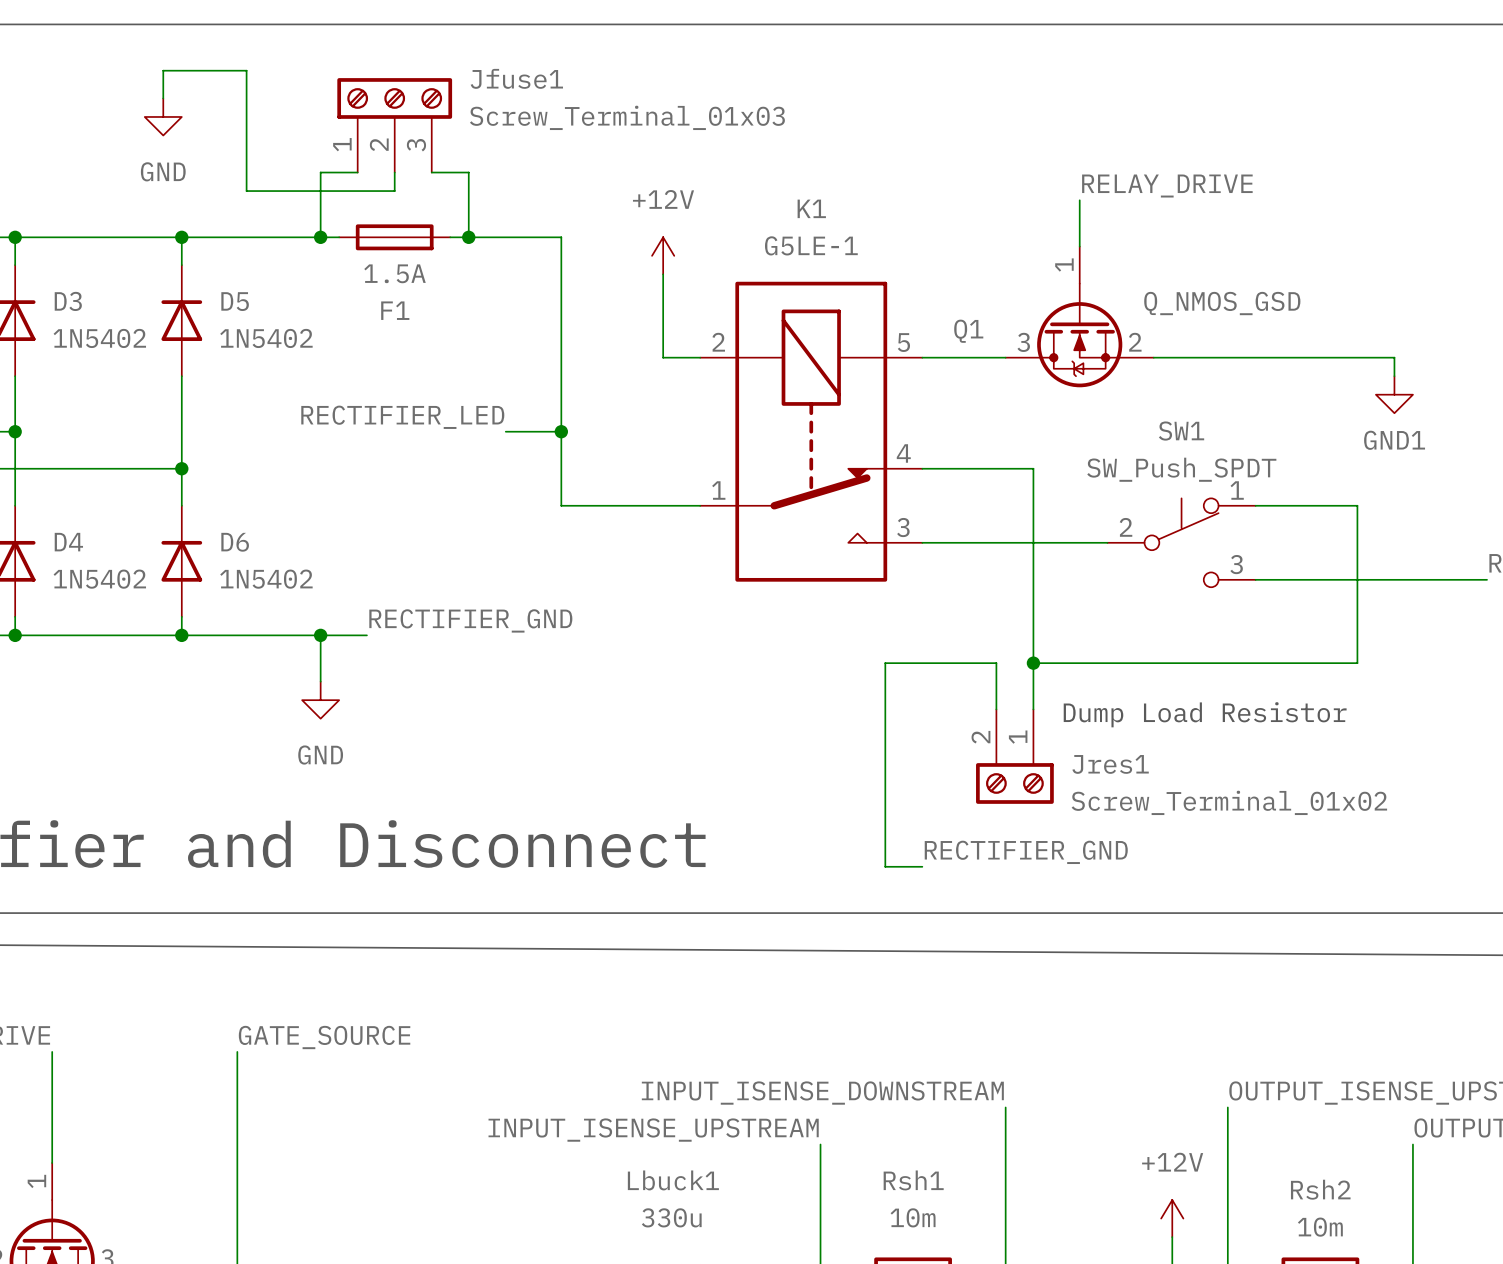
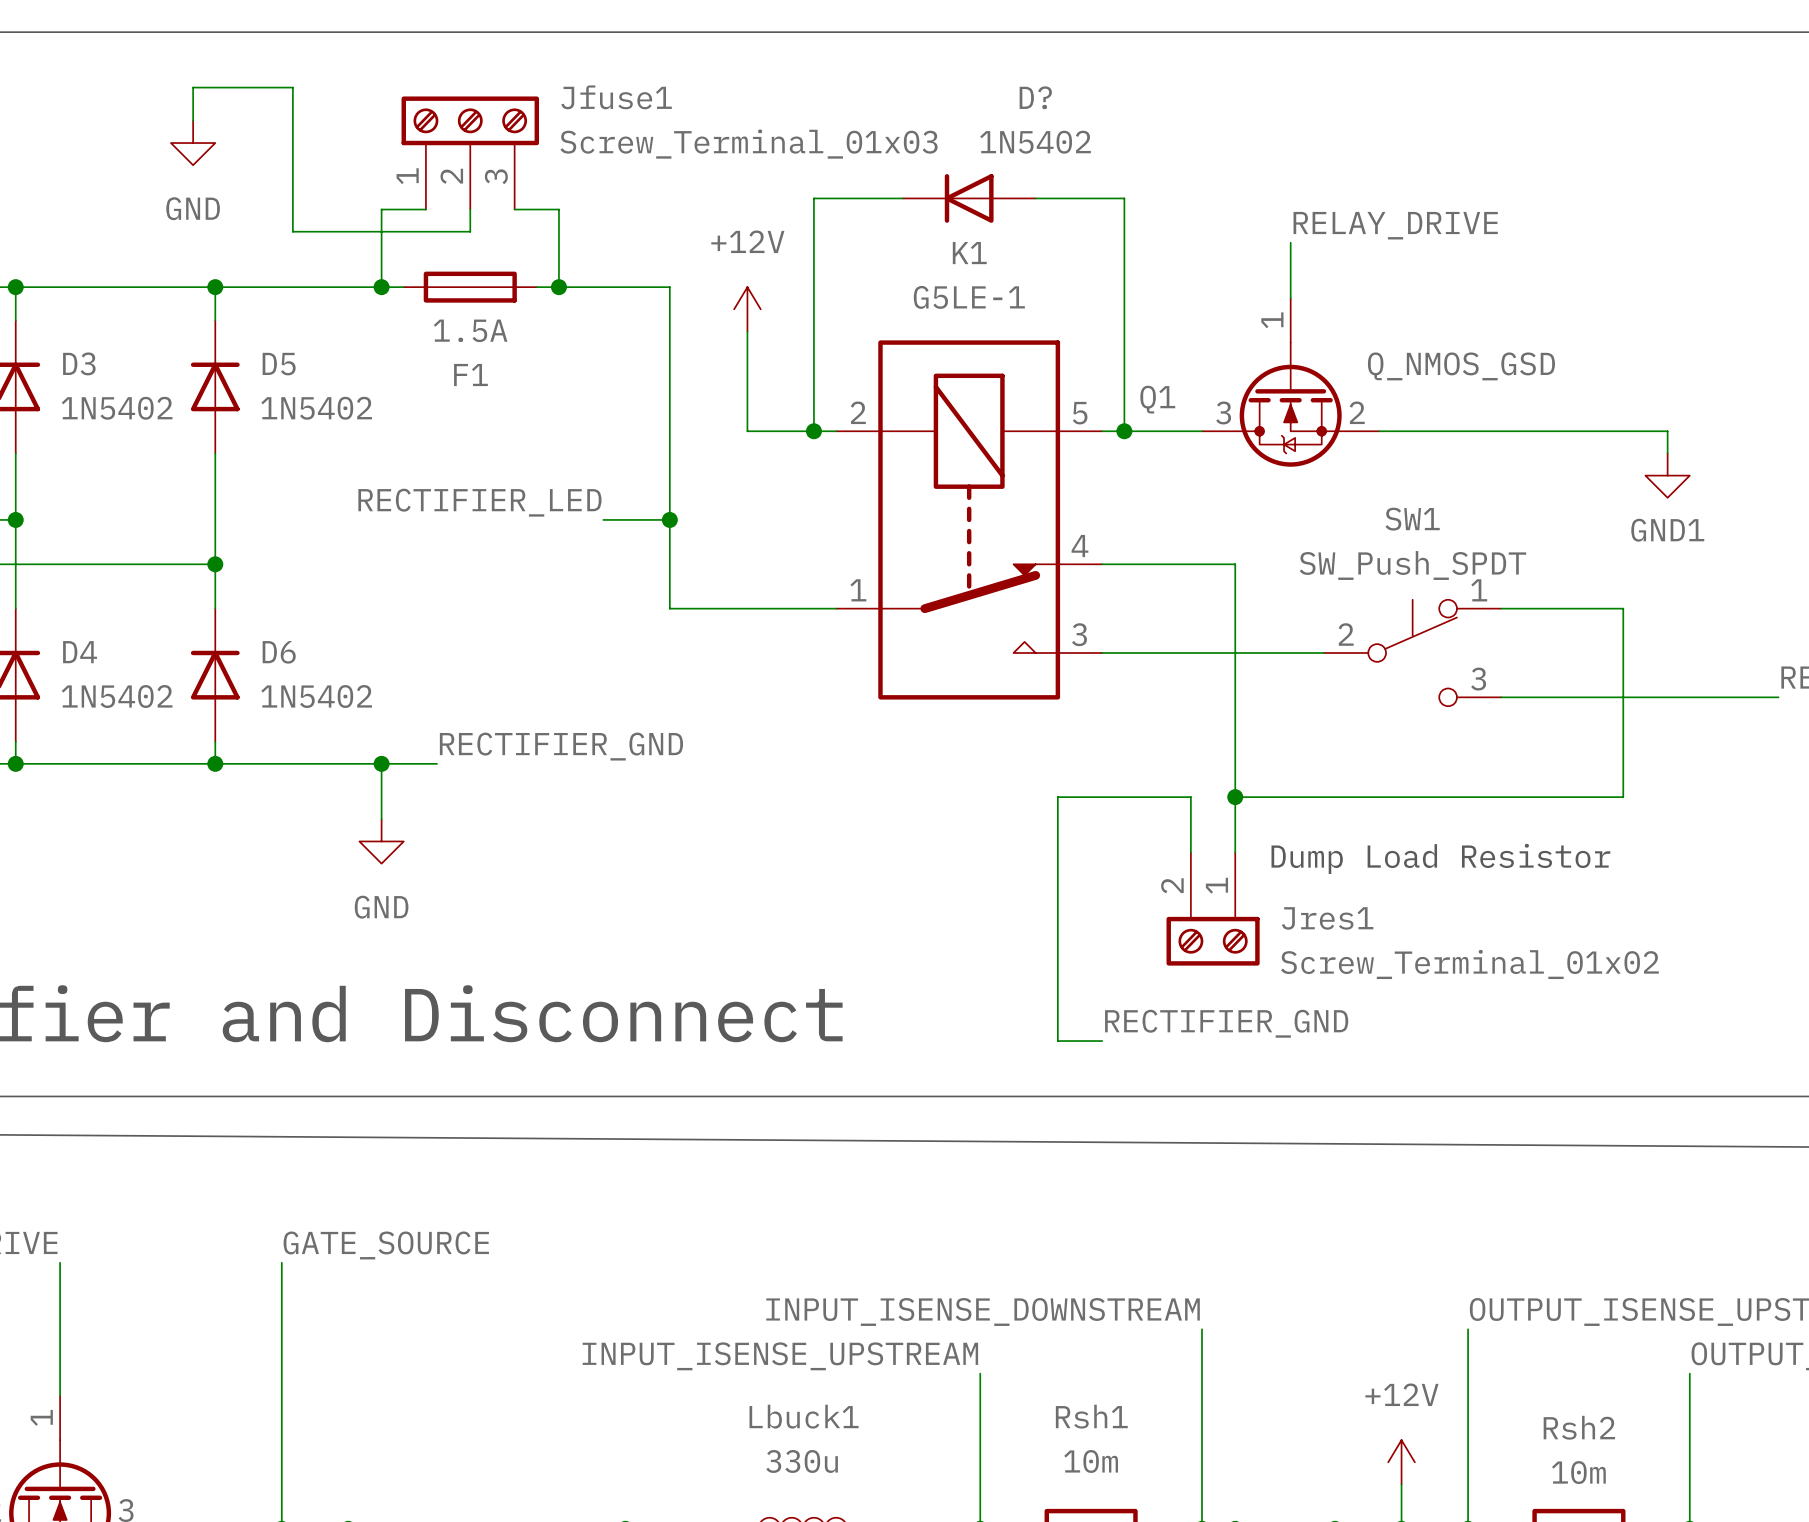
wire: none -> (902, 198) (813, 198) (813, 431)
D?: none -> 1N5402 (969, 198)
wire: none -> (1035, 198) (1124, 198) (1124, 431)
power symbol position: +12V (663, 255) -> +12V (747, 309)
wire: (663, 274) (663, 357) -> (747, 331) (747, 431) (791, 431)
junction: none -> (813, 431)
junction: none -> (1124, 431)

